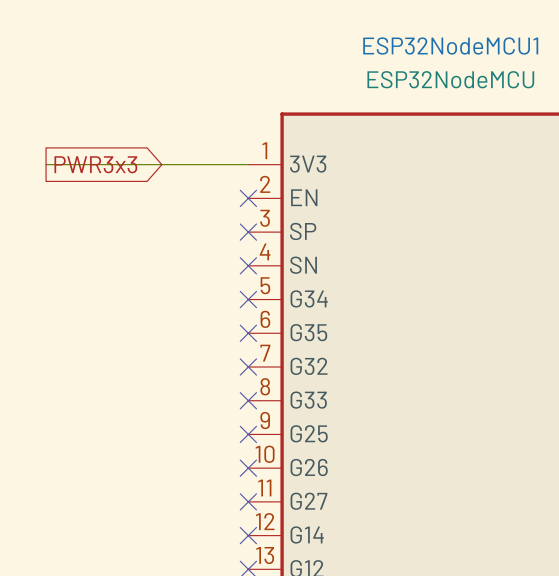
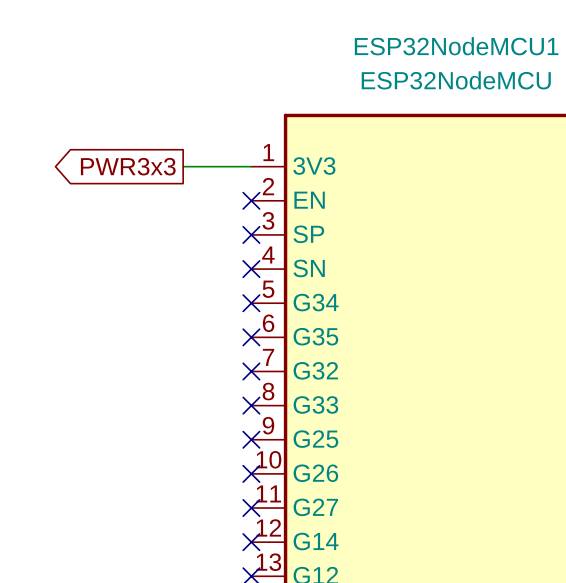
wire: (46, 164) (180, 164) -> none
global label rotation: 0° (95, 164) -> 180° (128, 166)

